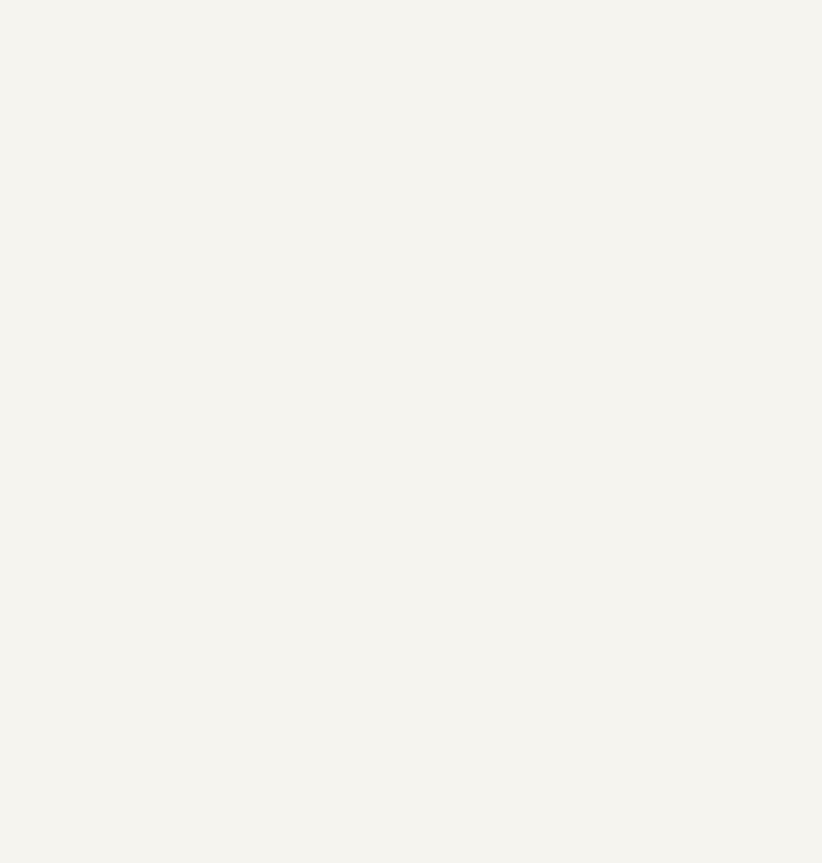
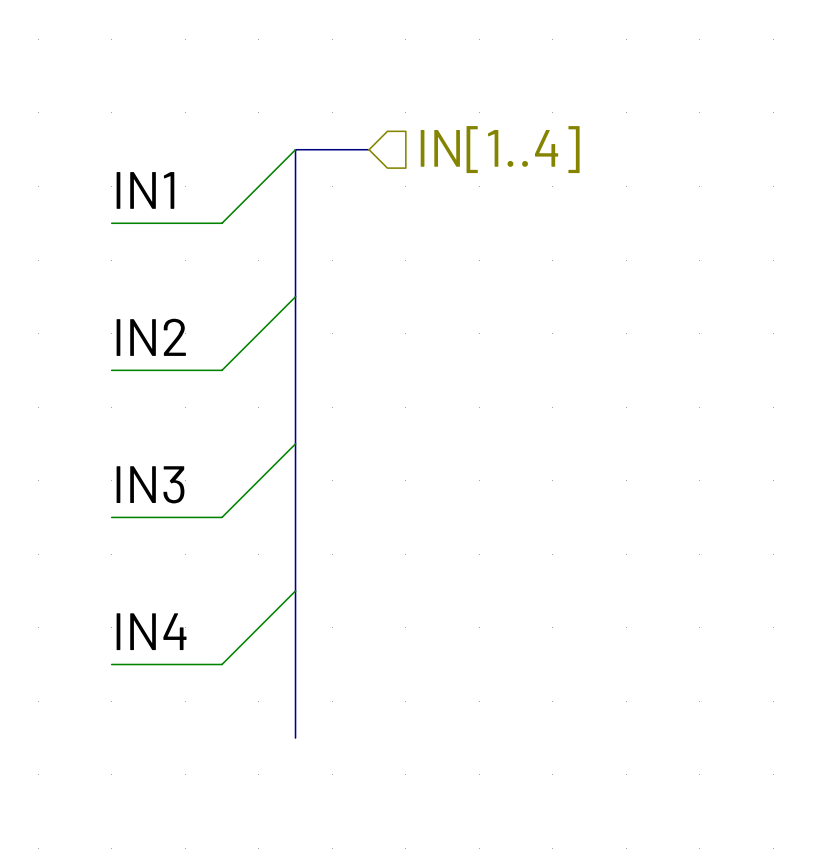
wire: none -> (295, 149) (221, 223) (111, 223)
bus: none -> (369, 149) (295, 149) (295, 738)
hierarchical label: none -> IN[1..4] (500, 149)
label: none -> IN1 (145, 190)
wire: none -> (295, 296) (221, 370) (111, 370)
label: none -> IN2 (151, 337)
wire: none -> (295, 443) (221, 517) (111, 517)
label: none -> IN3 (150, 484)
wire: none -> (295, 590) (221, 664) (111, 664)
label: none -> IN4 (151, 631)

